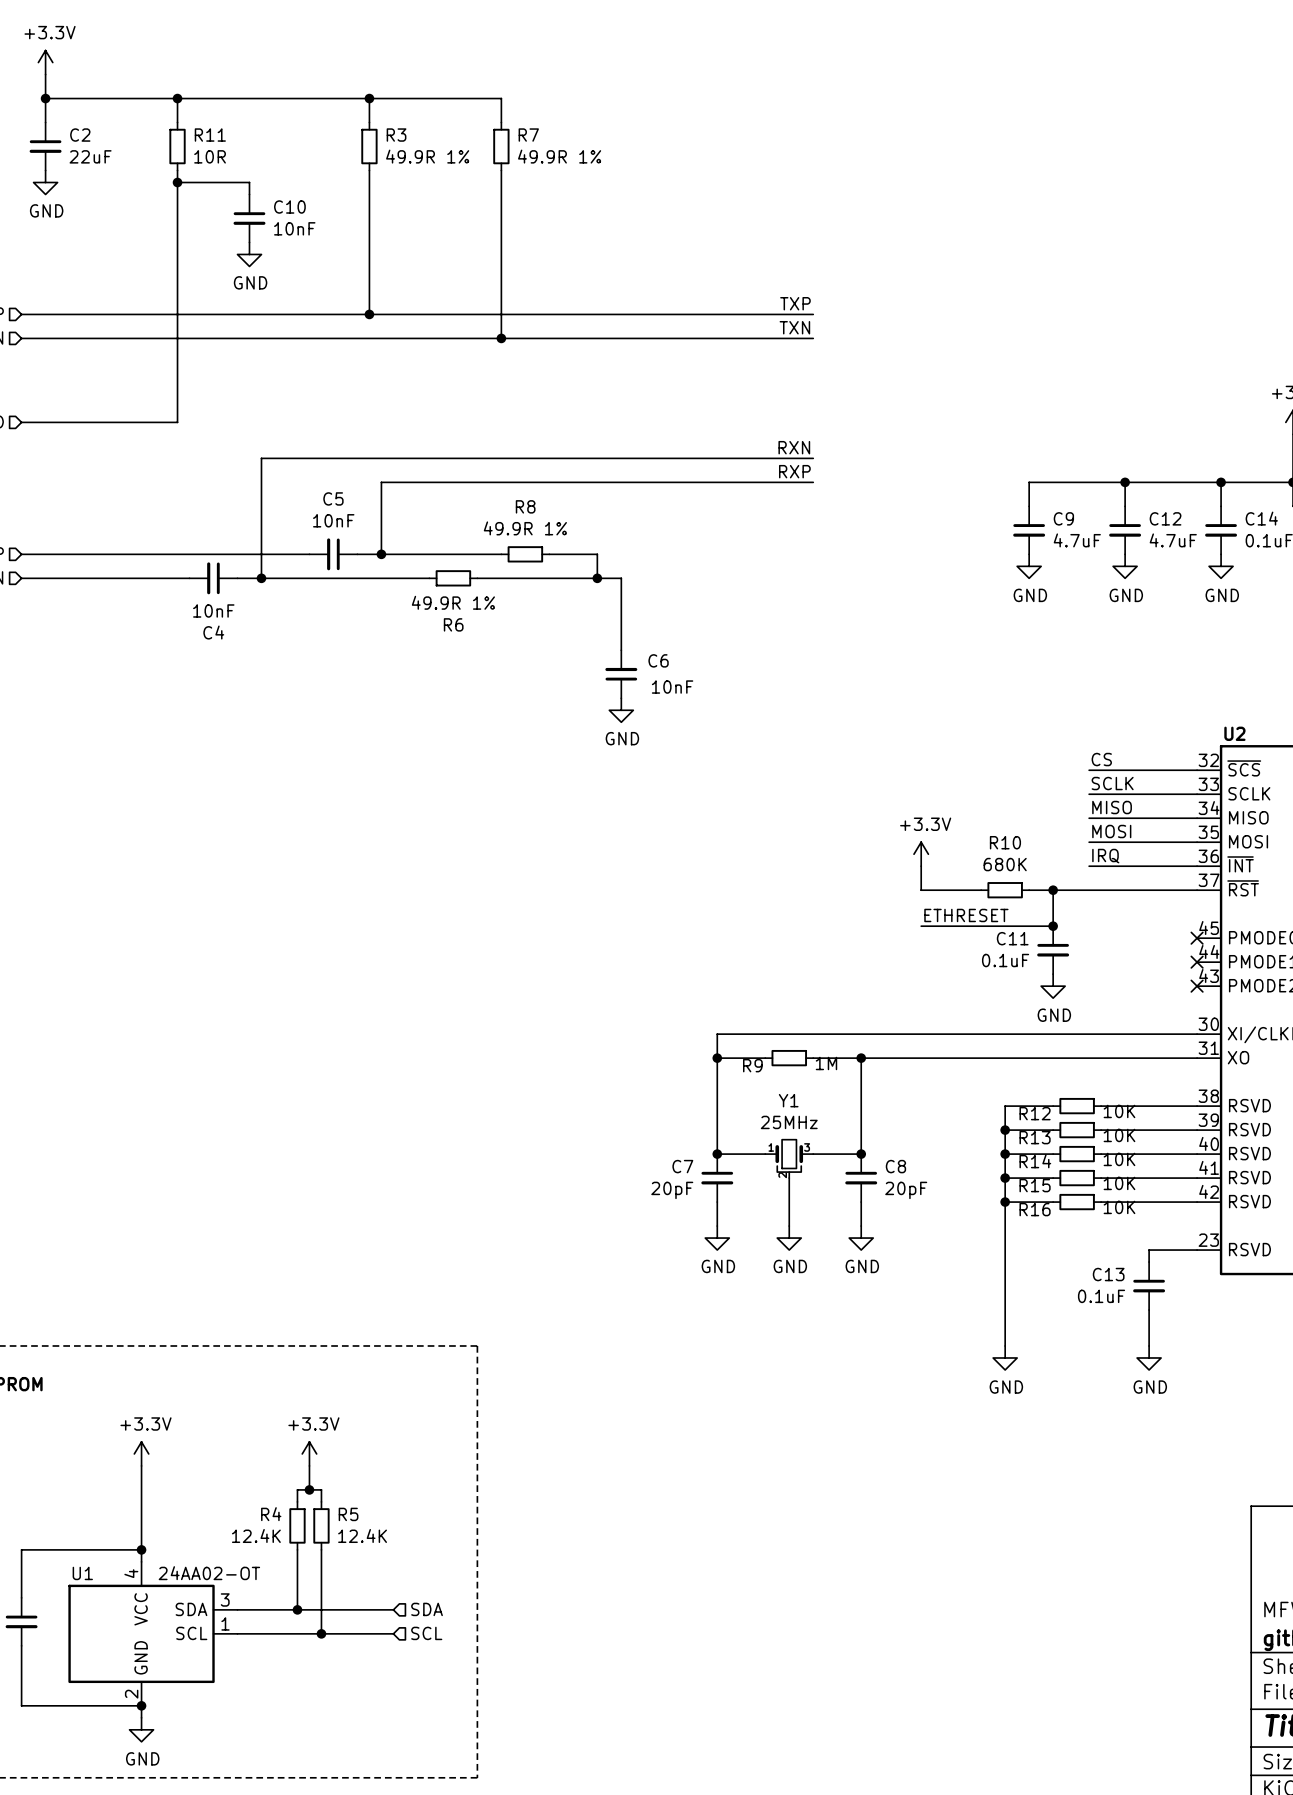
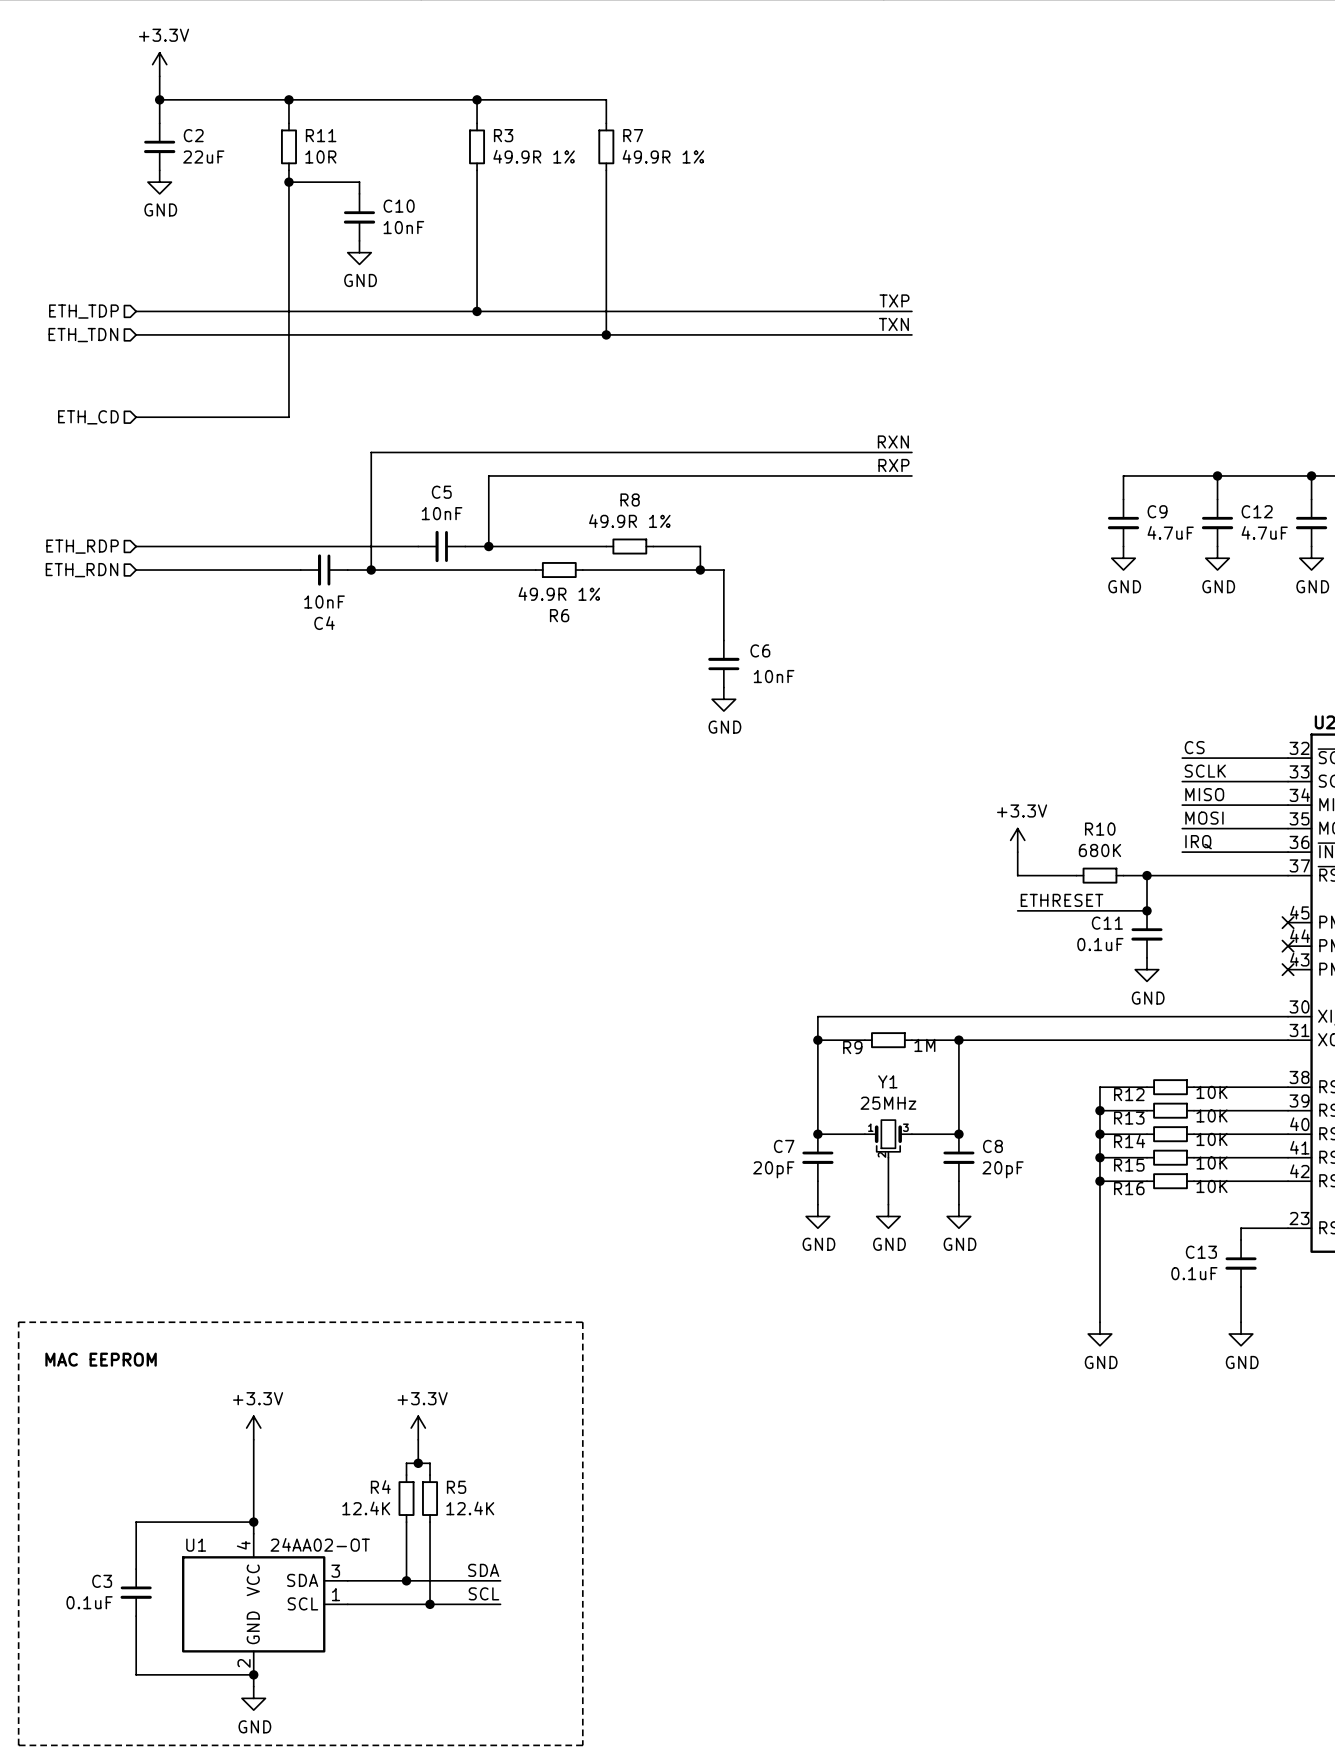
label: none -> SDA (483, 1570)
hierarchical label: SDA (427, 1609) -> none
label: none -> SCL (483, 1593)
hierarchical label: SCL (426, 1633) -> none

